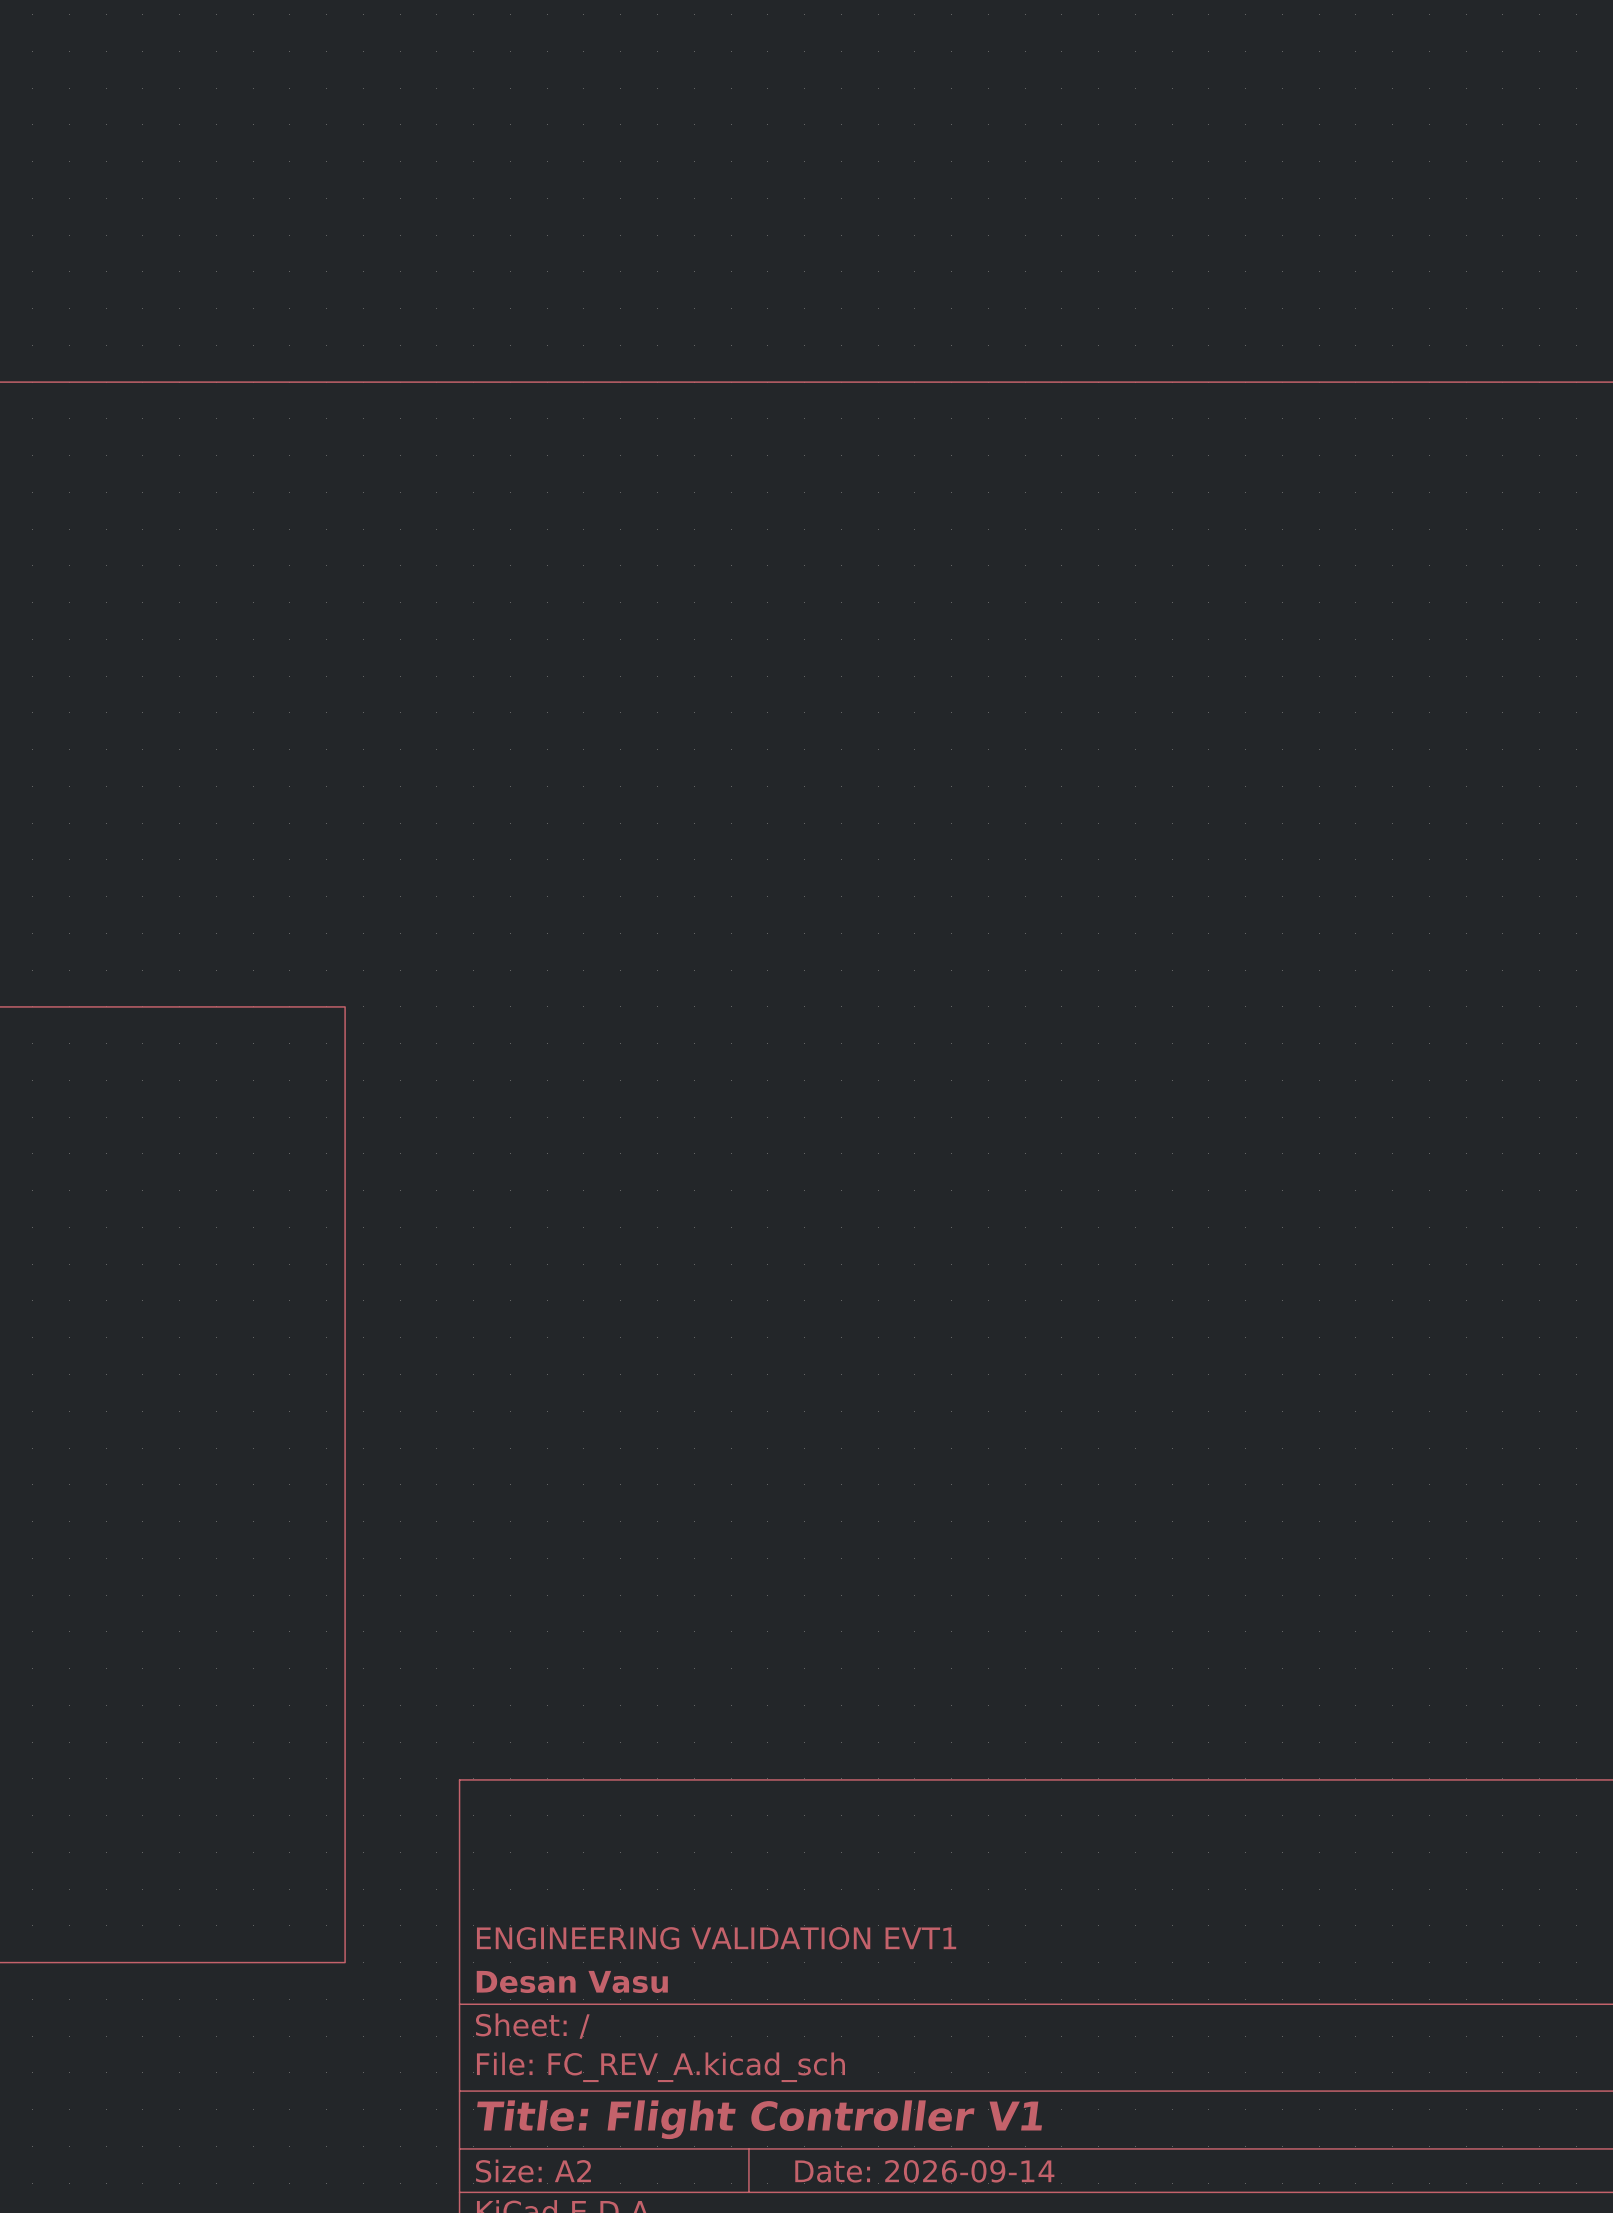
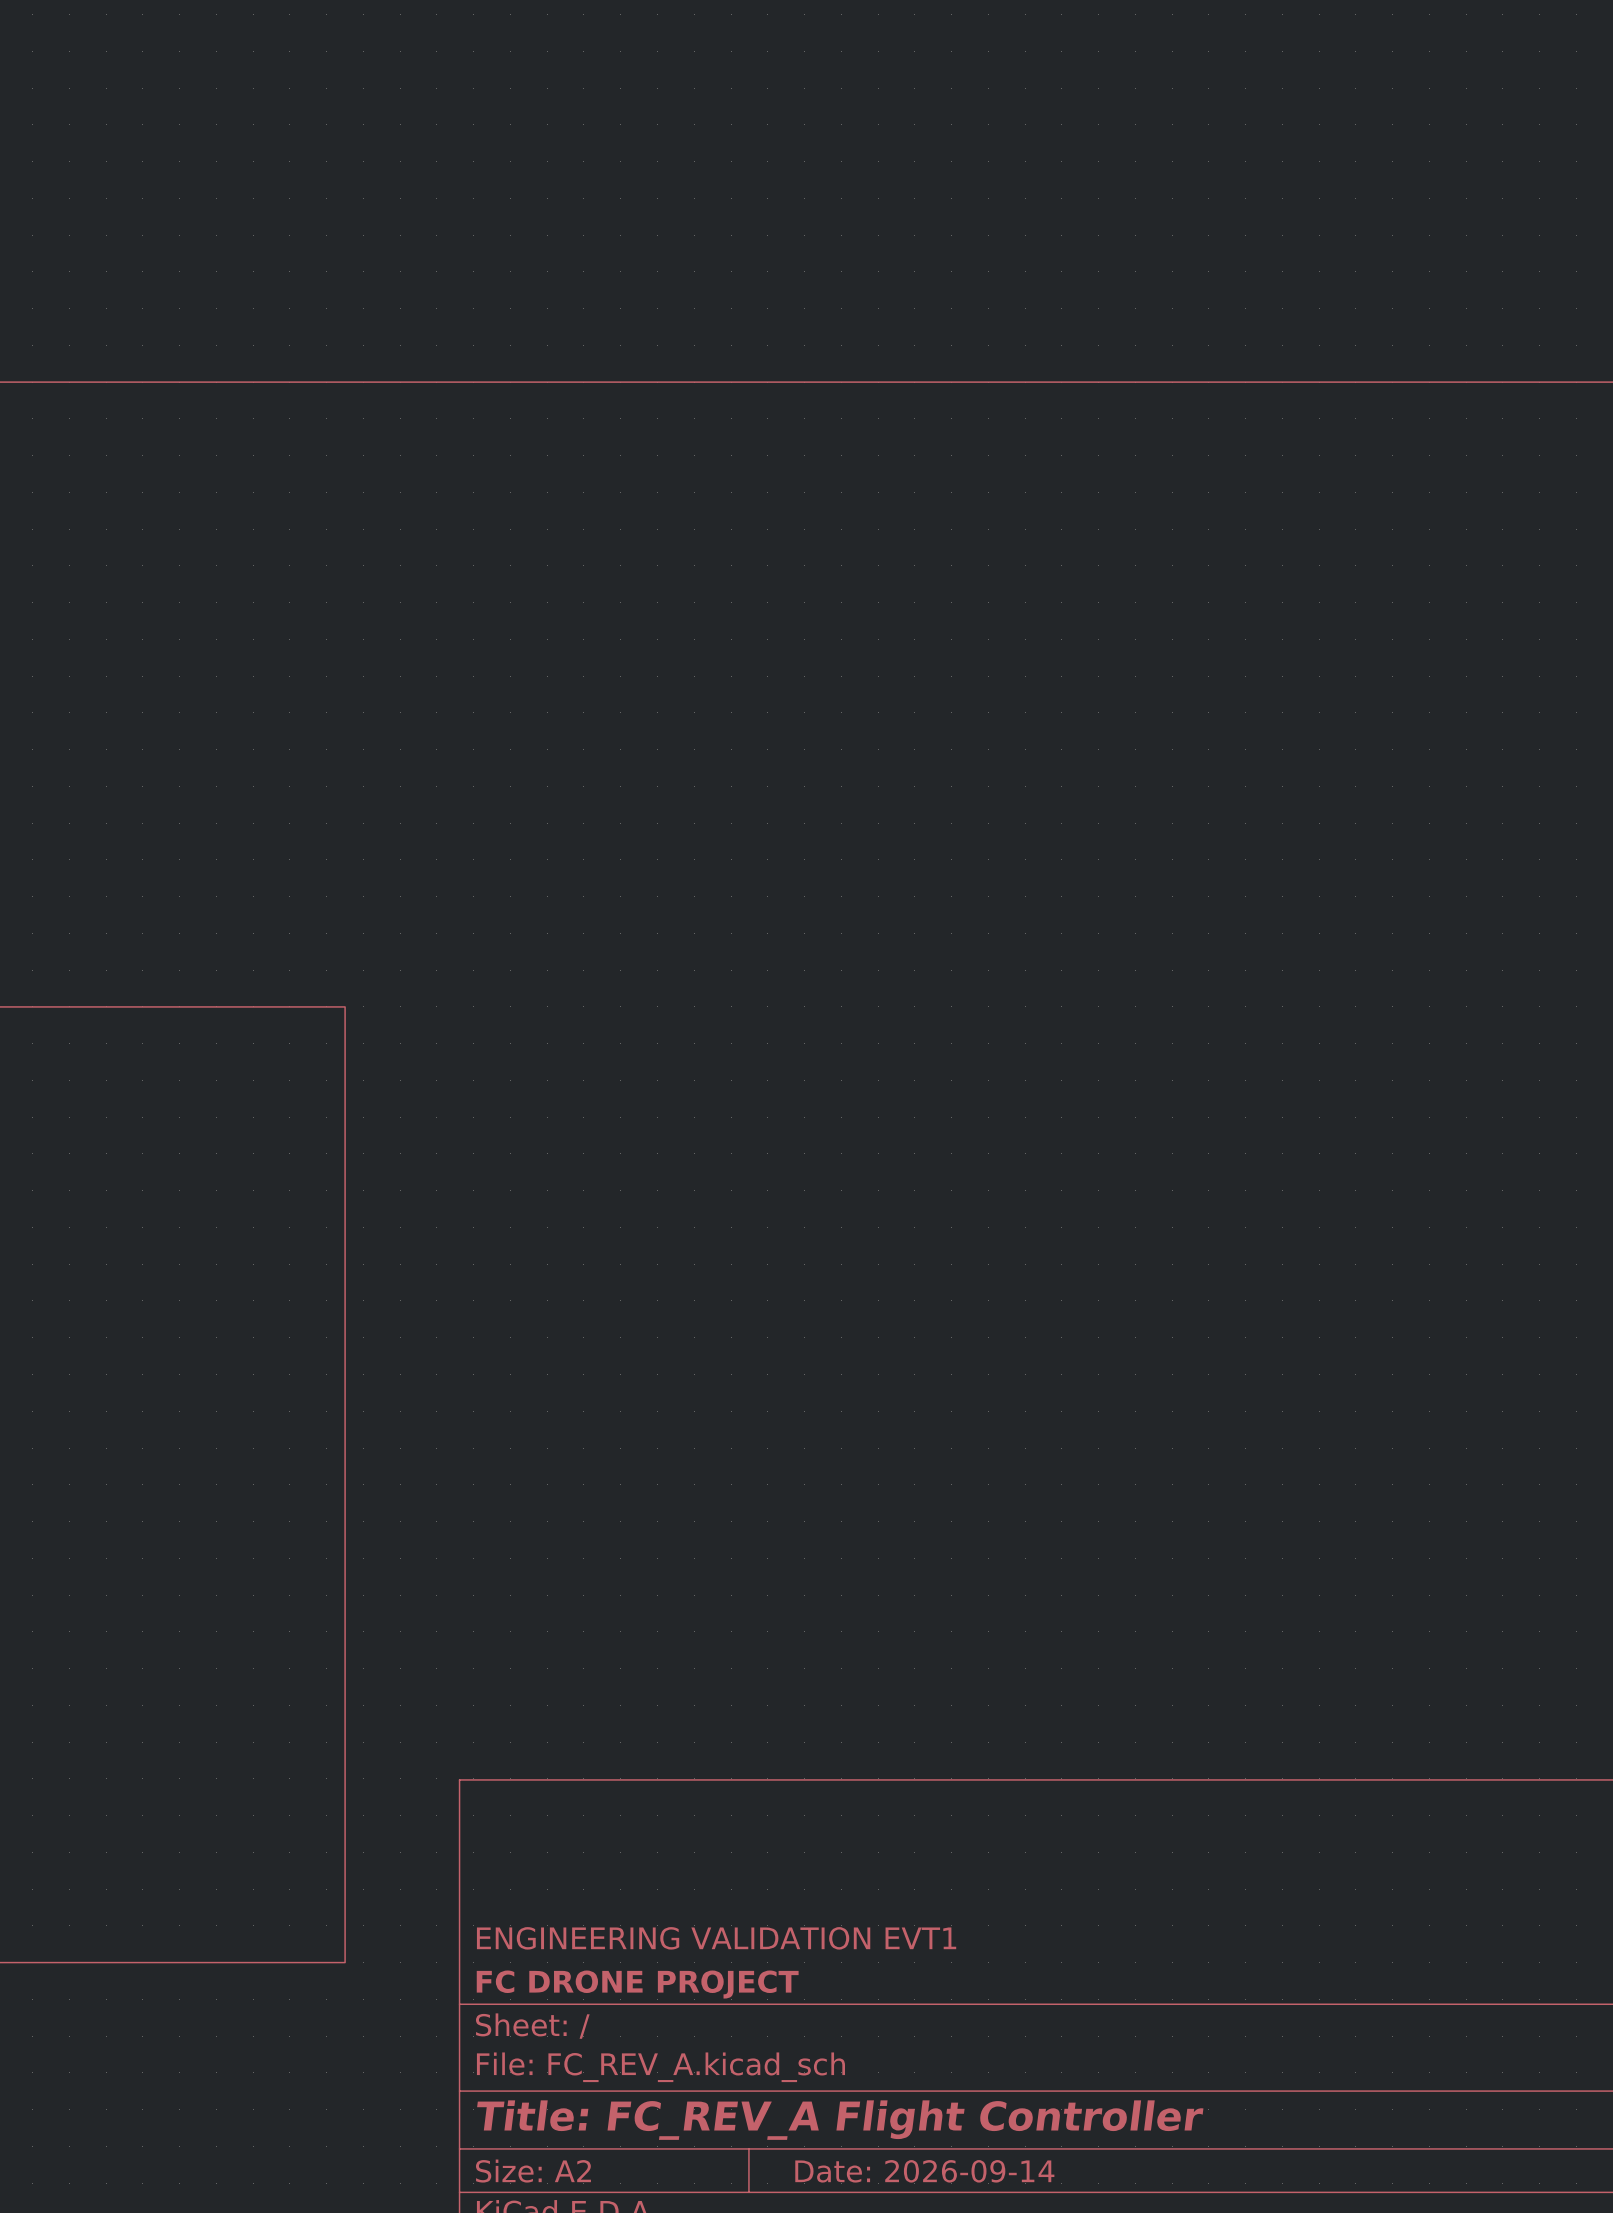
title block: Desan Vasu (572, 1981) -> FC DRONE PROJECT (637, 1984)
title block: Title: Flight Controller V1 (759, 2119) -> Title: FC_REV_A Flight Controller (840, 2120)

